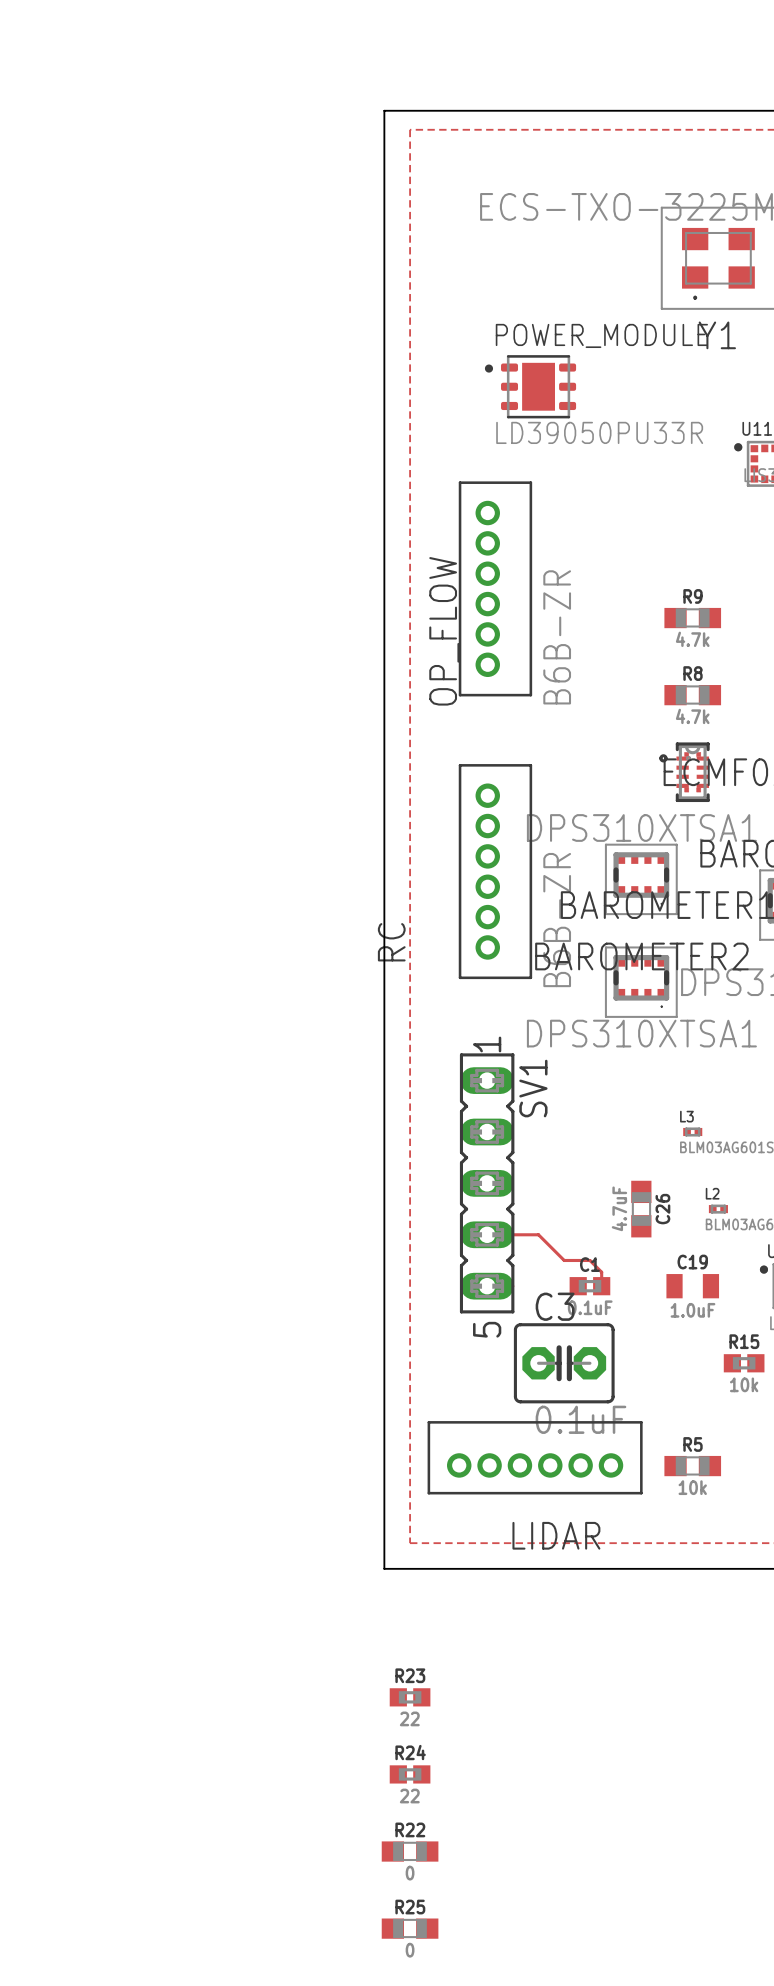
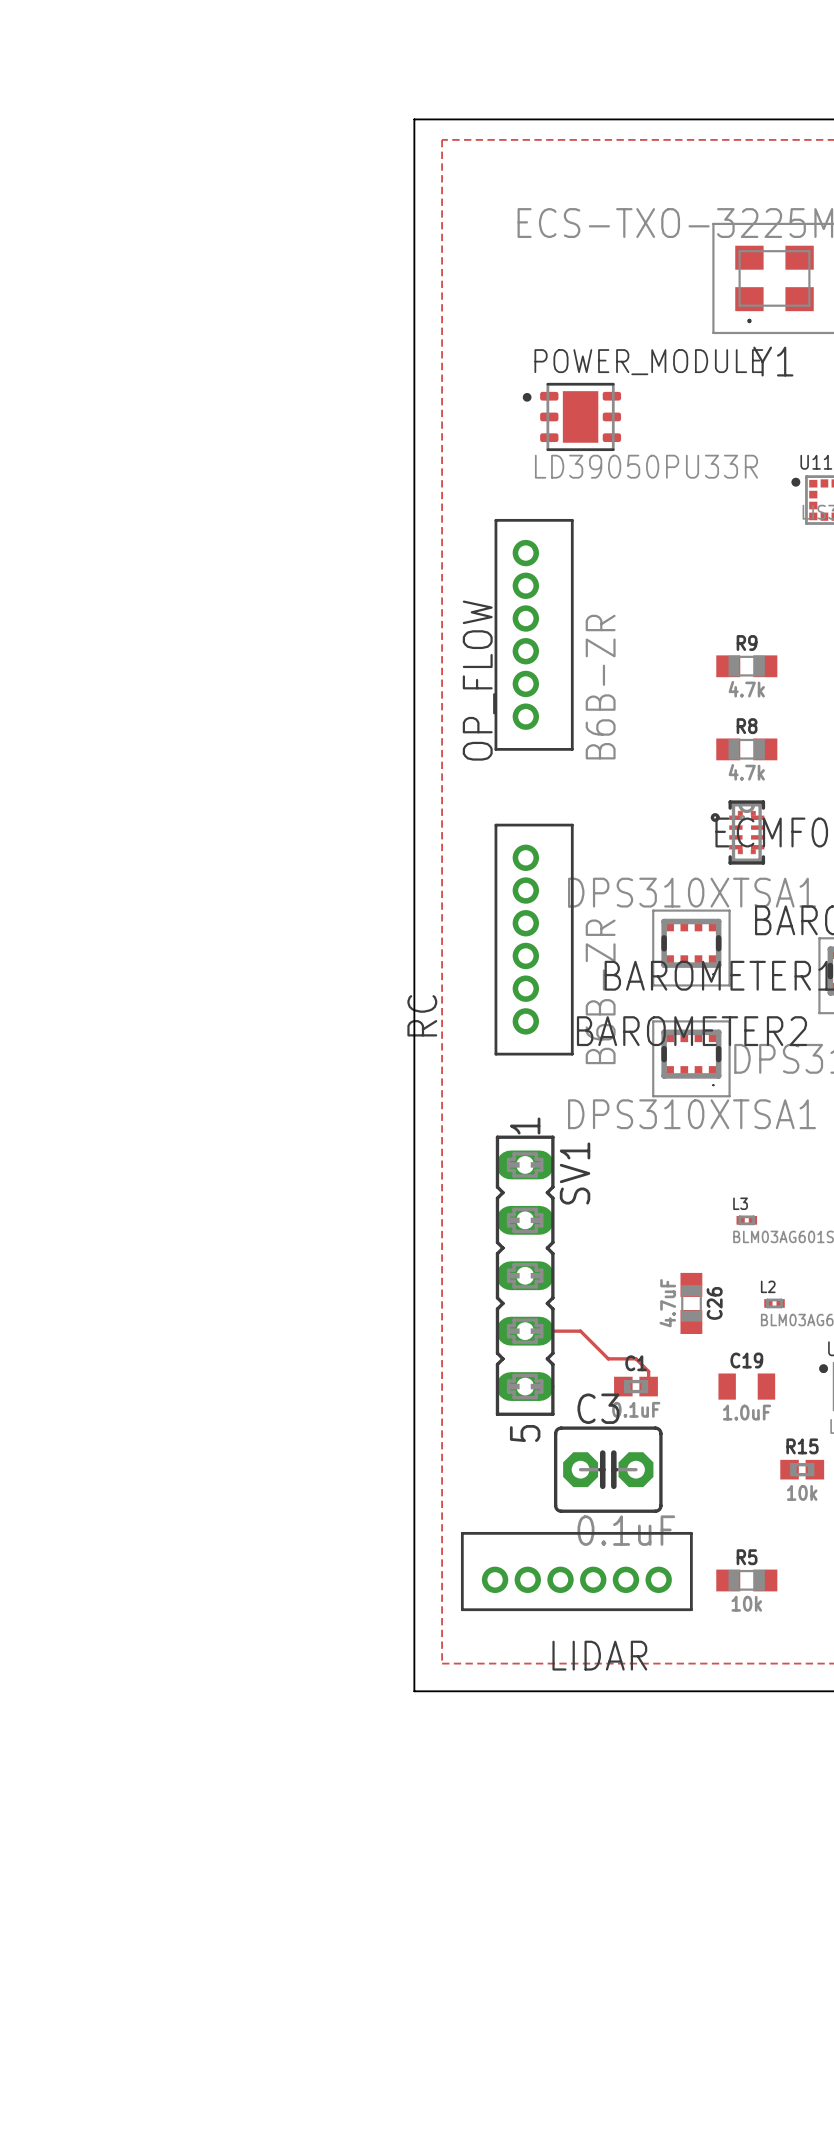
R23: 22 (410, 1697) -> none
R24: 22 (410, 1774) -> none
R22: 0 (410, 1851) -> none
R25: 0 (410, 1928) -> none

